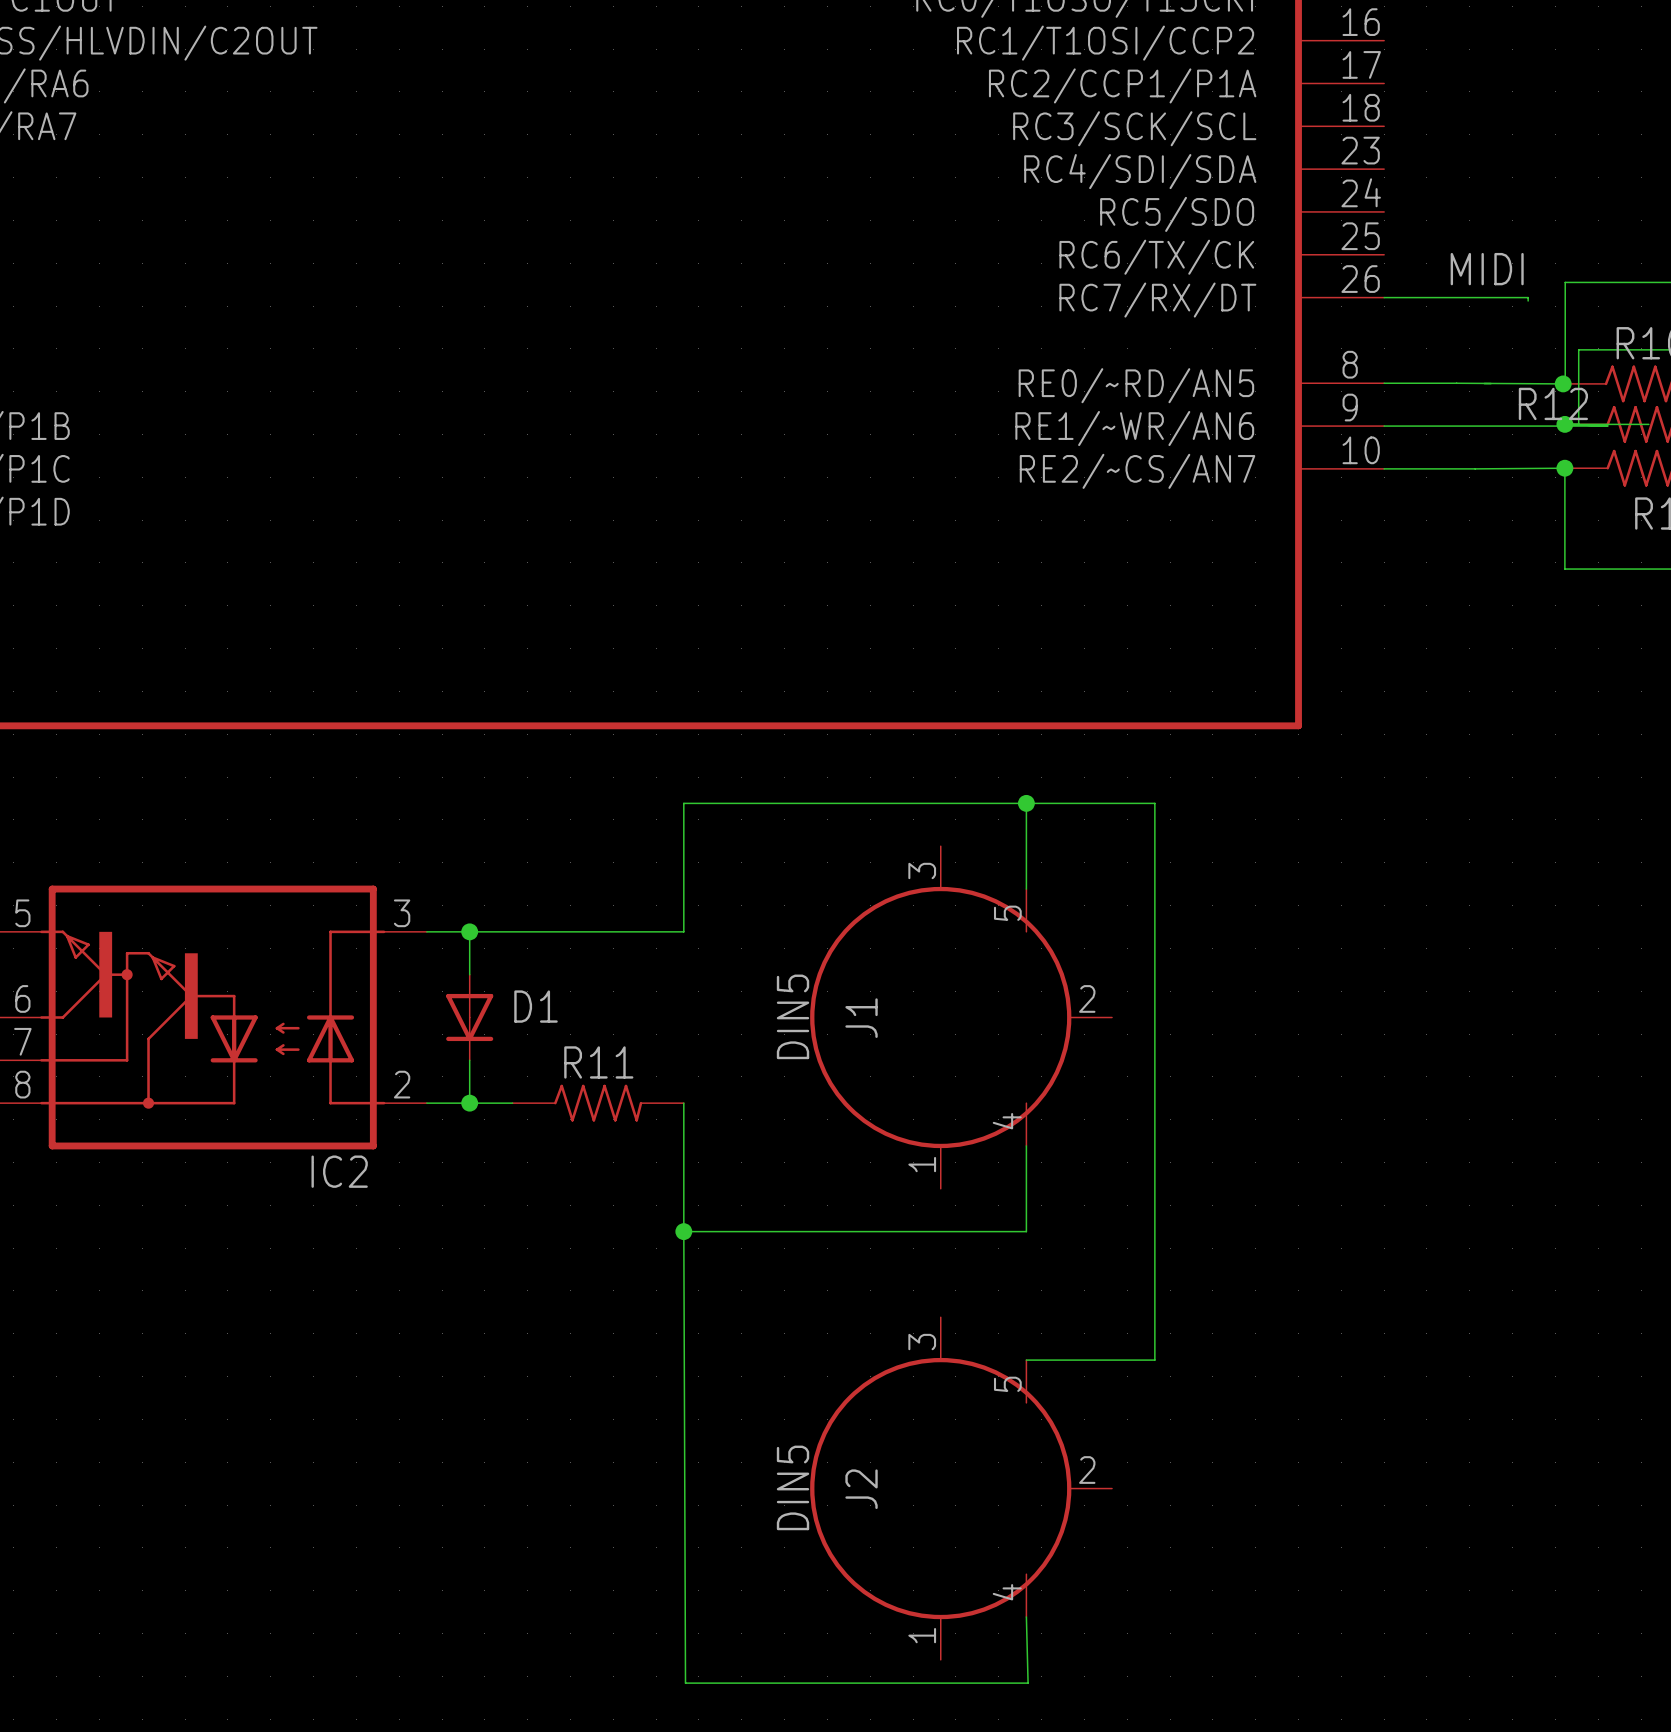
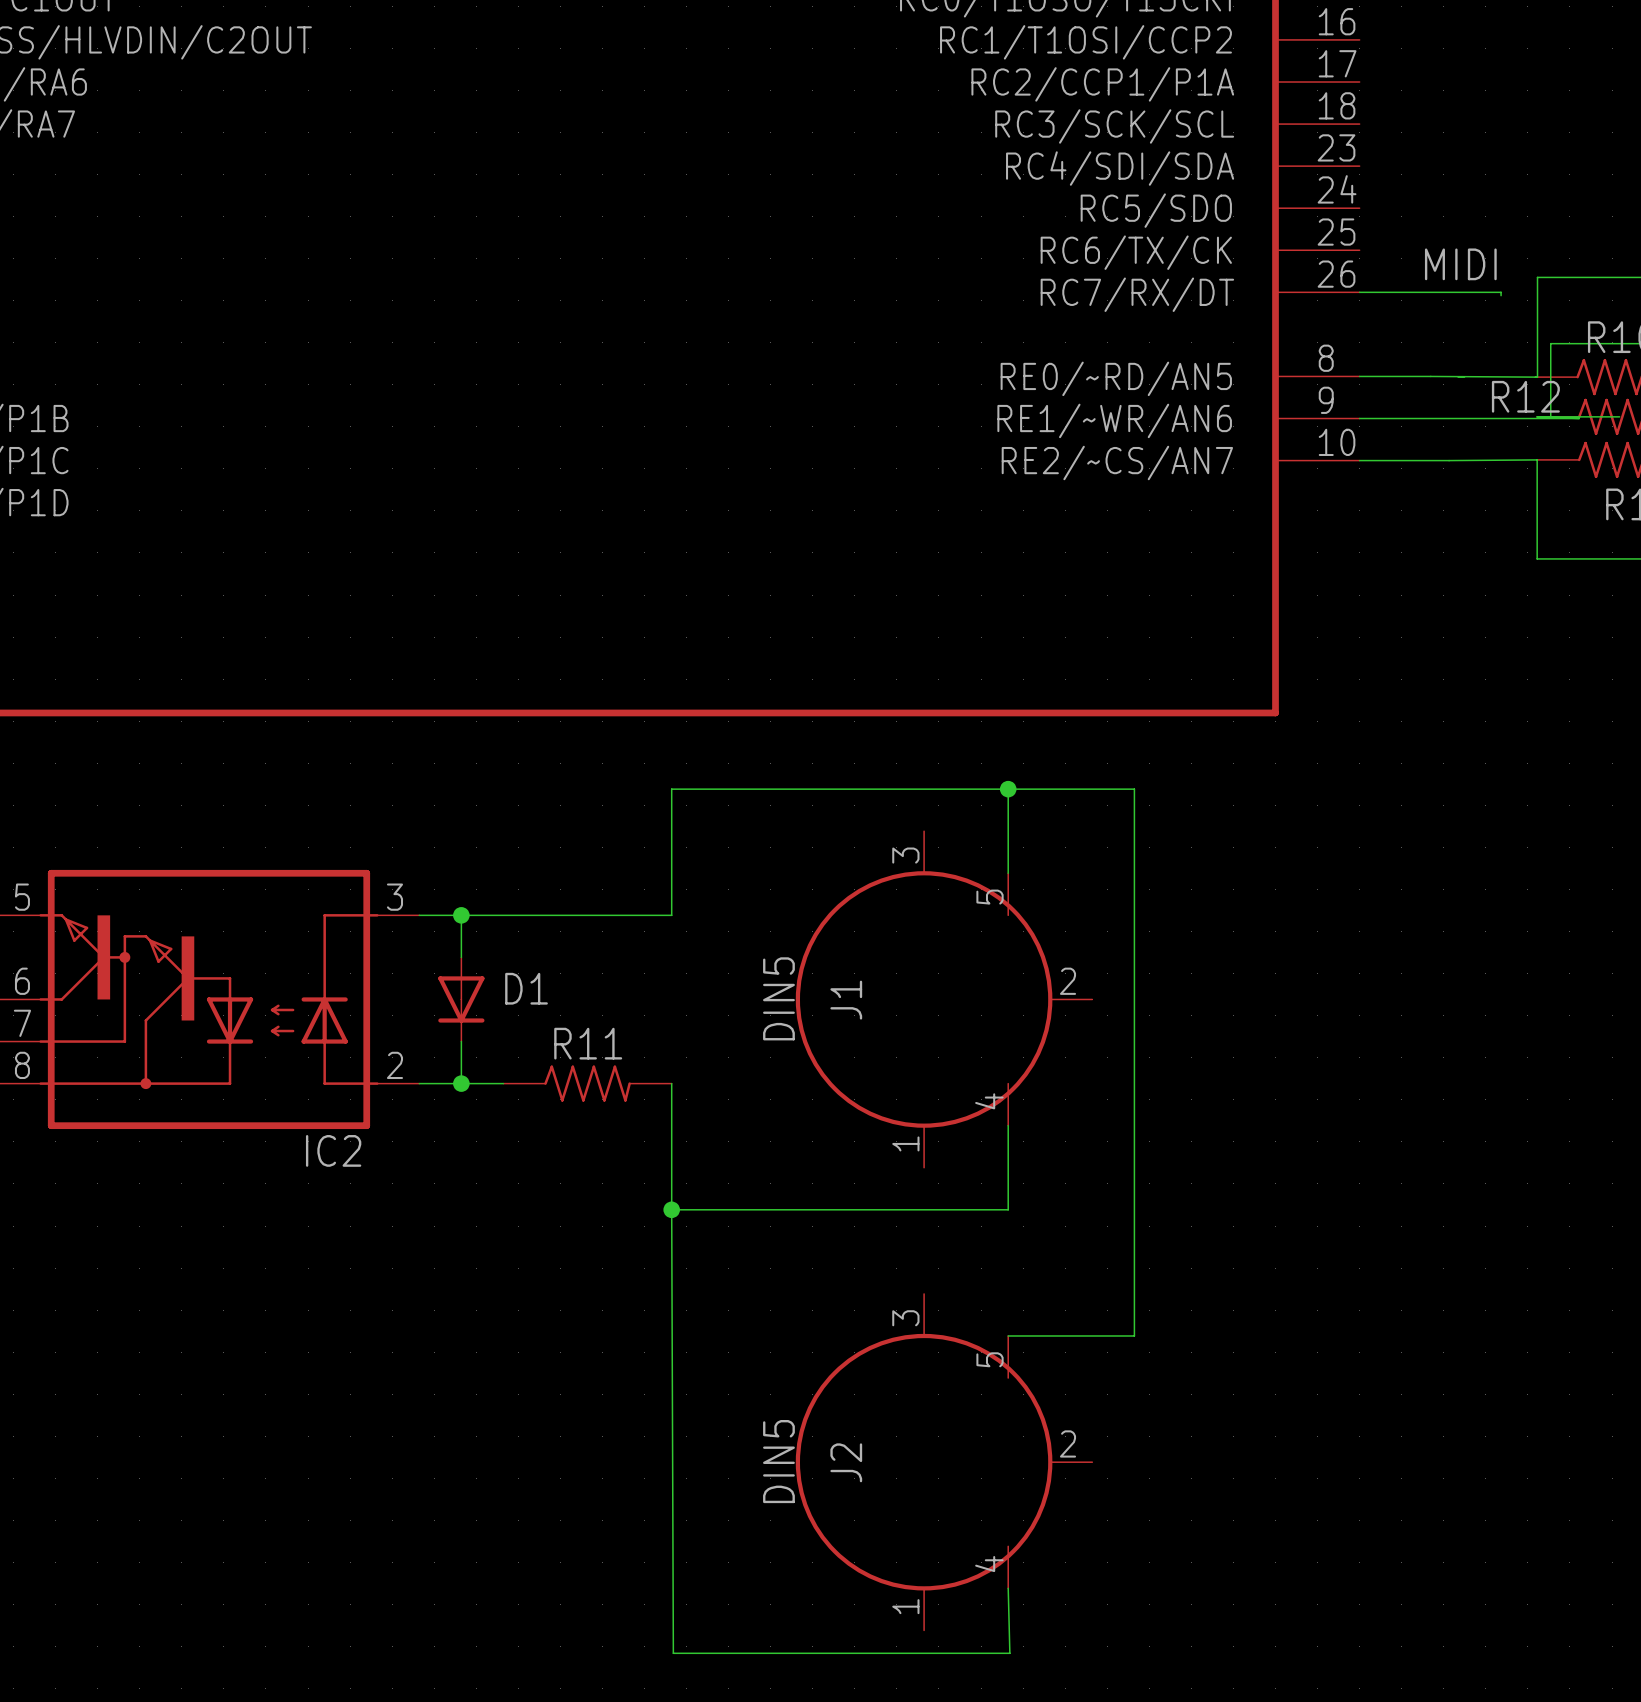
junction: (1563, 383) -> none
junction: (1564, 424) -> none
junction: (1564, 468) -> none

